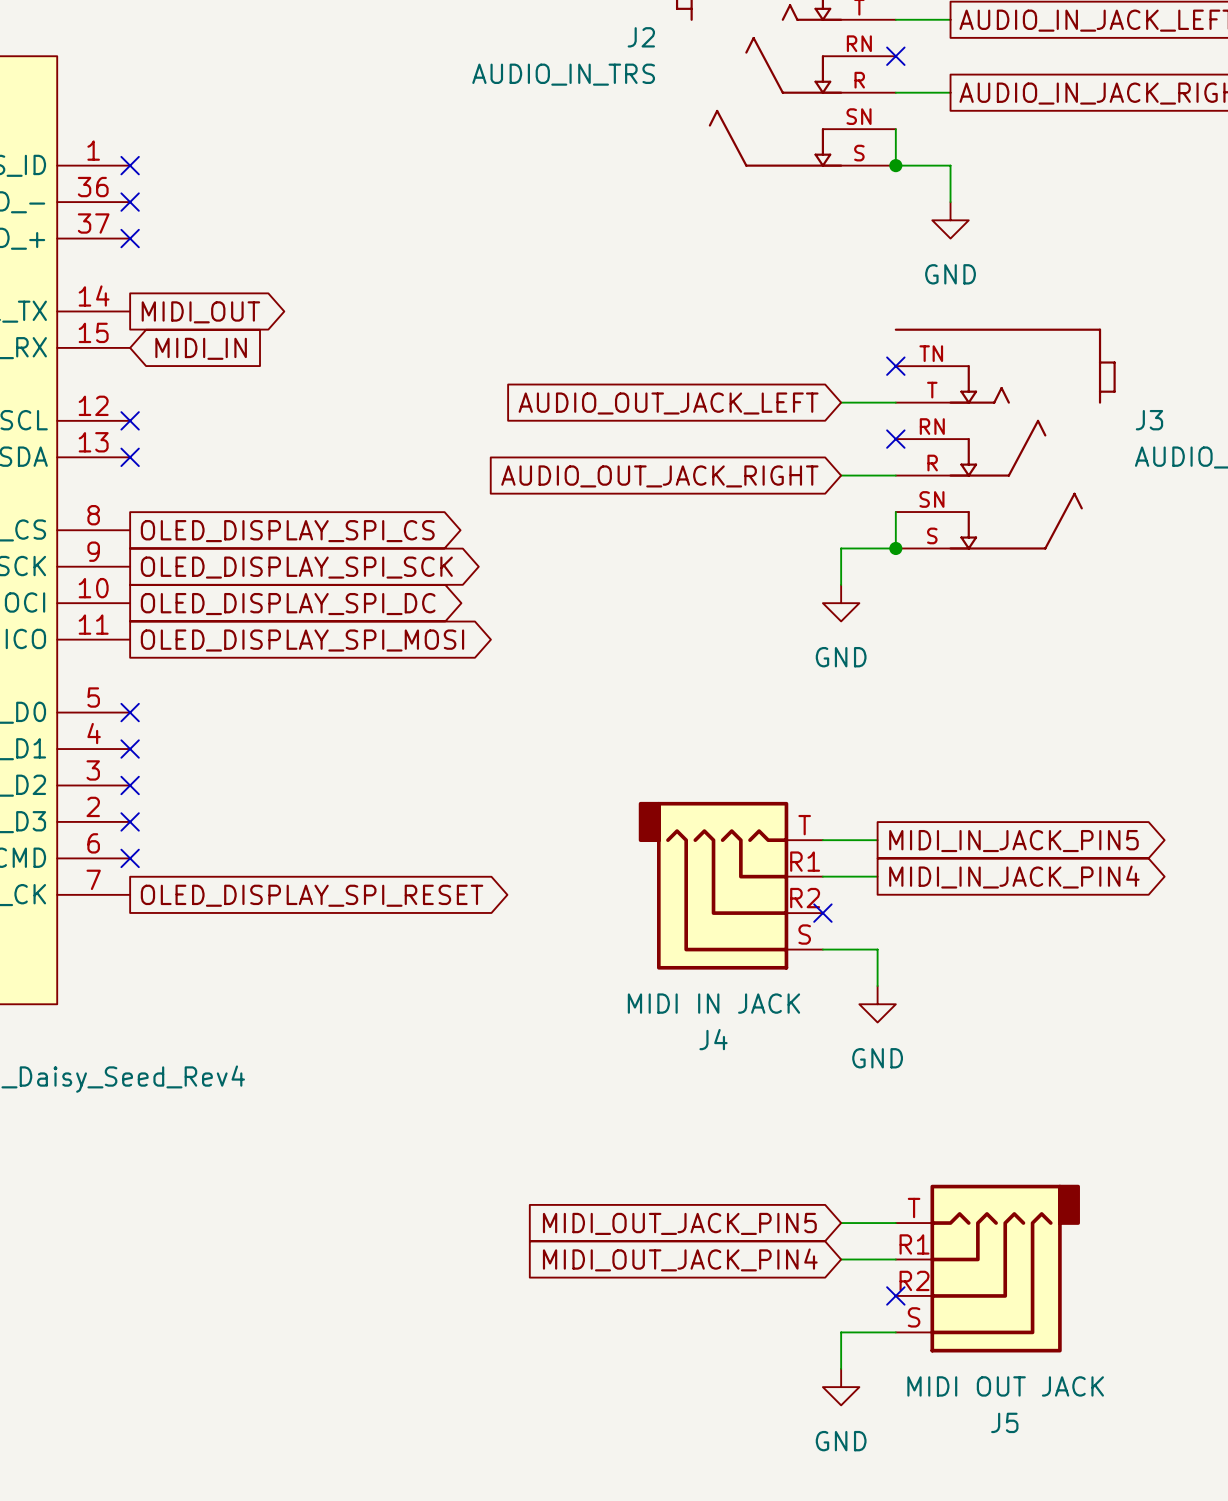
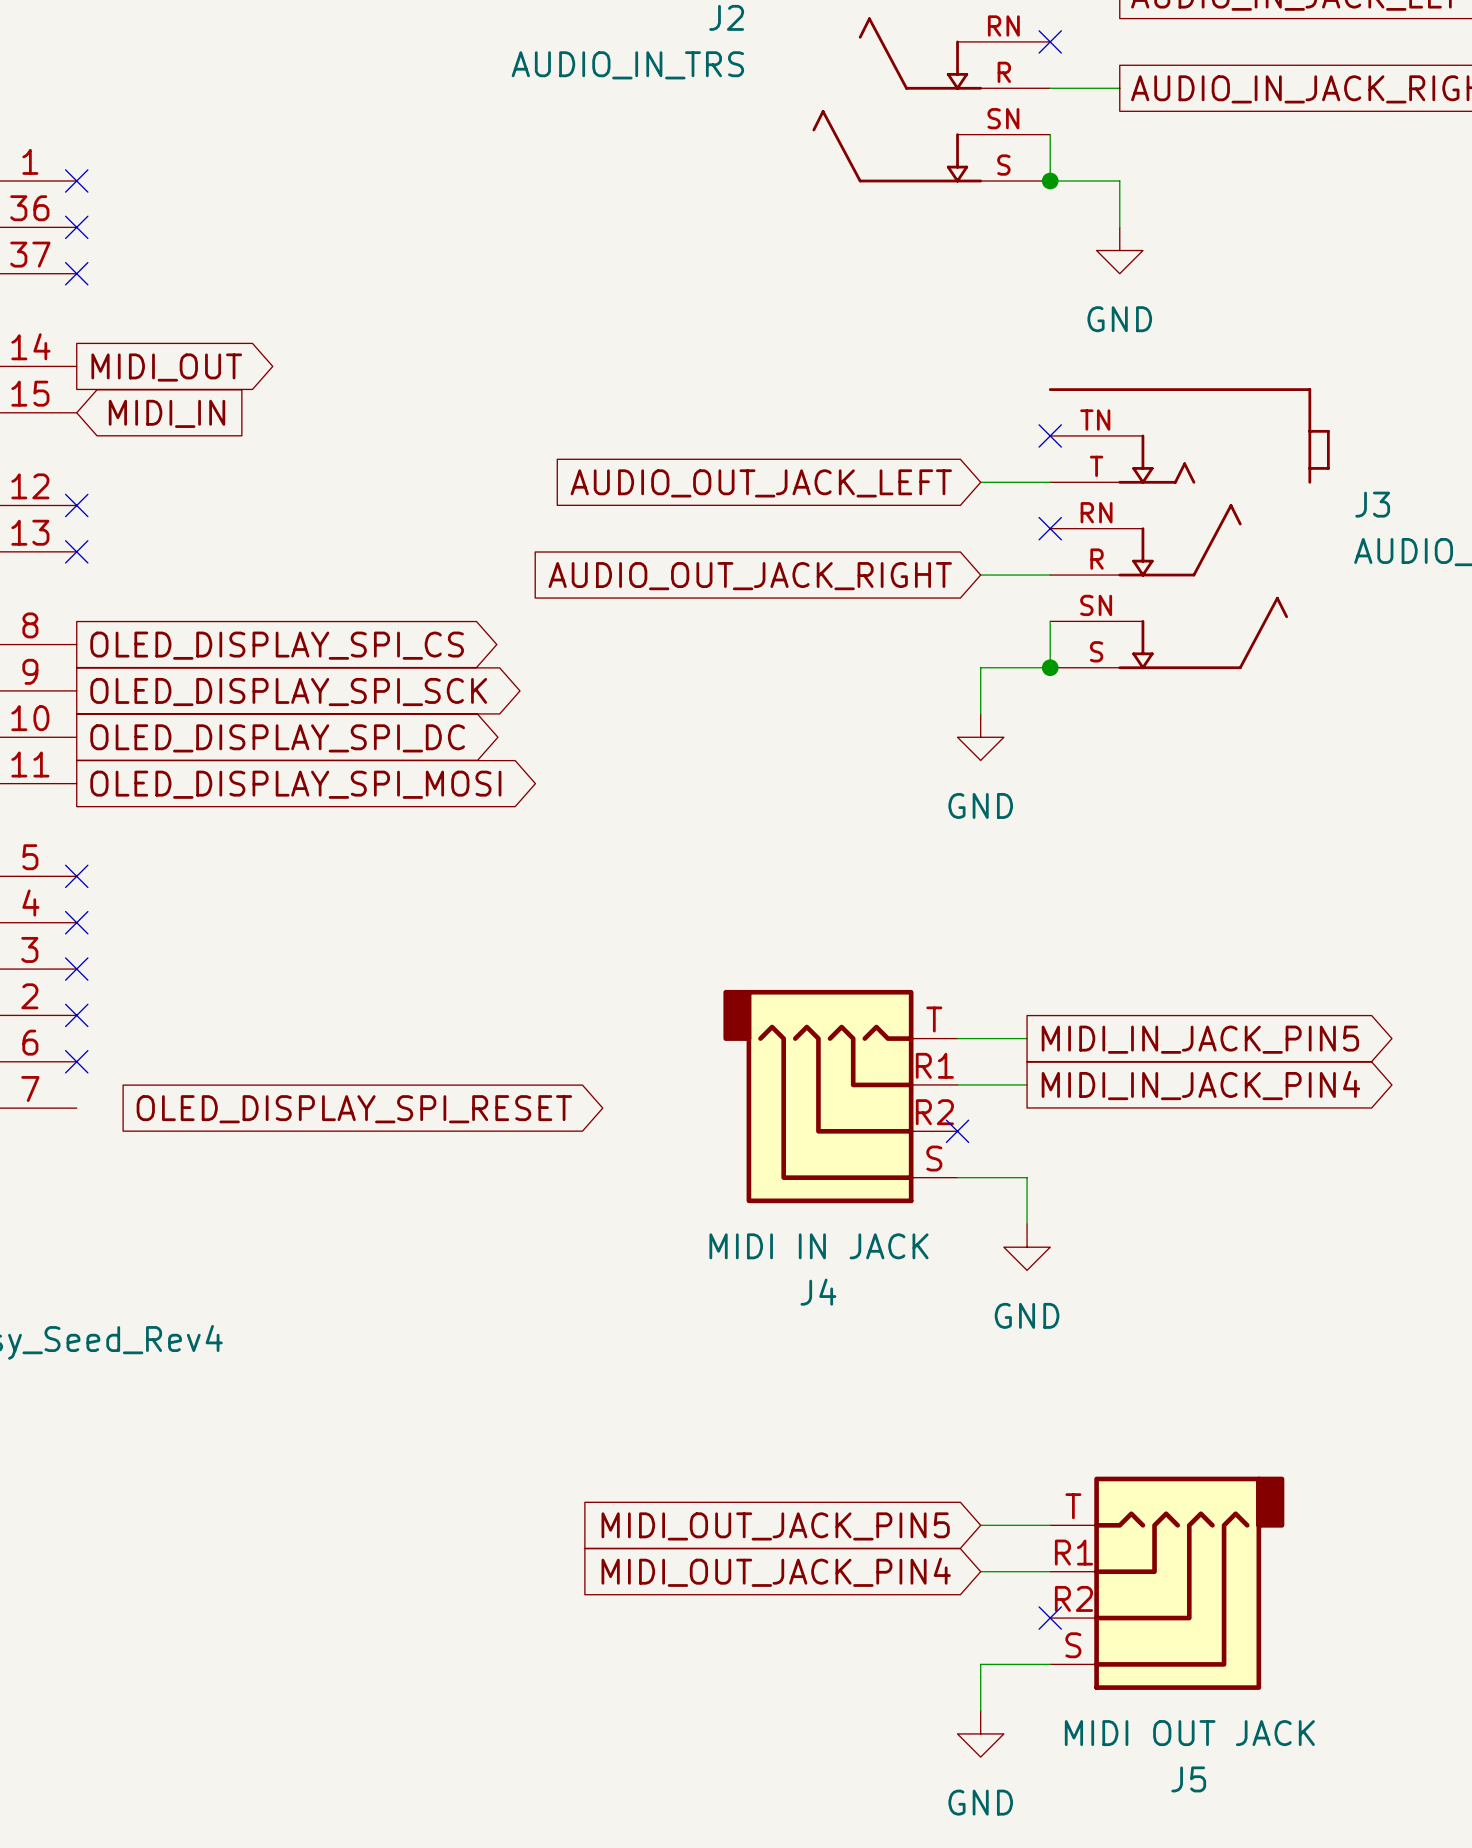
global label position: OLED_DISPLAY_SPI_RESET (312, 895) -> OLED_DISPLAY_SPI_RESET (354, 1109)

